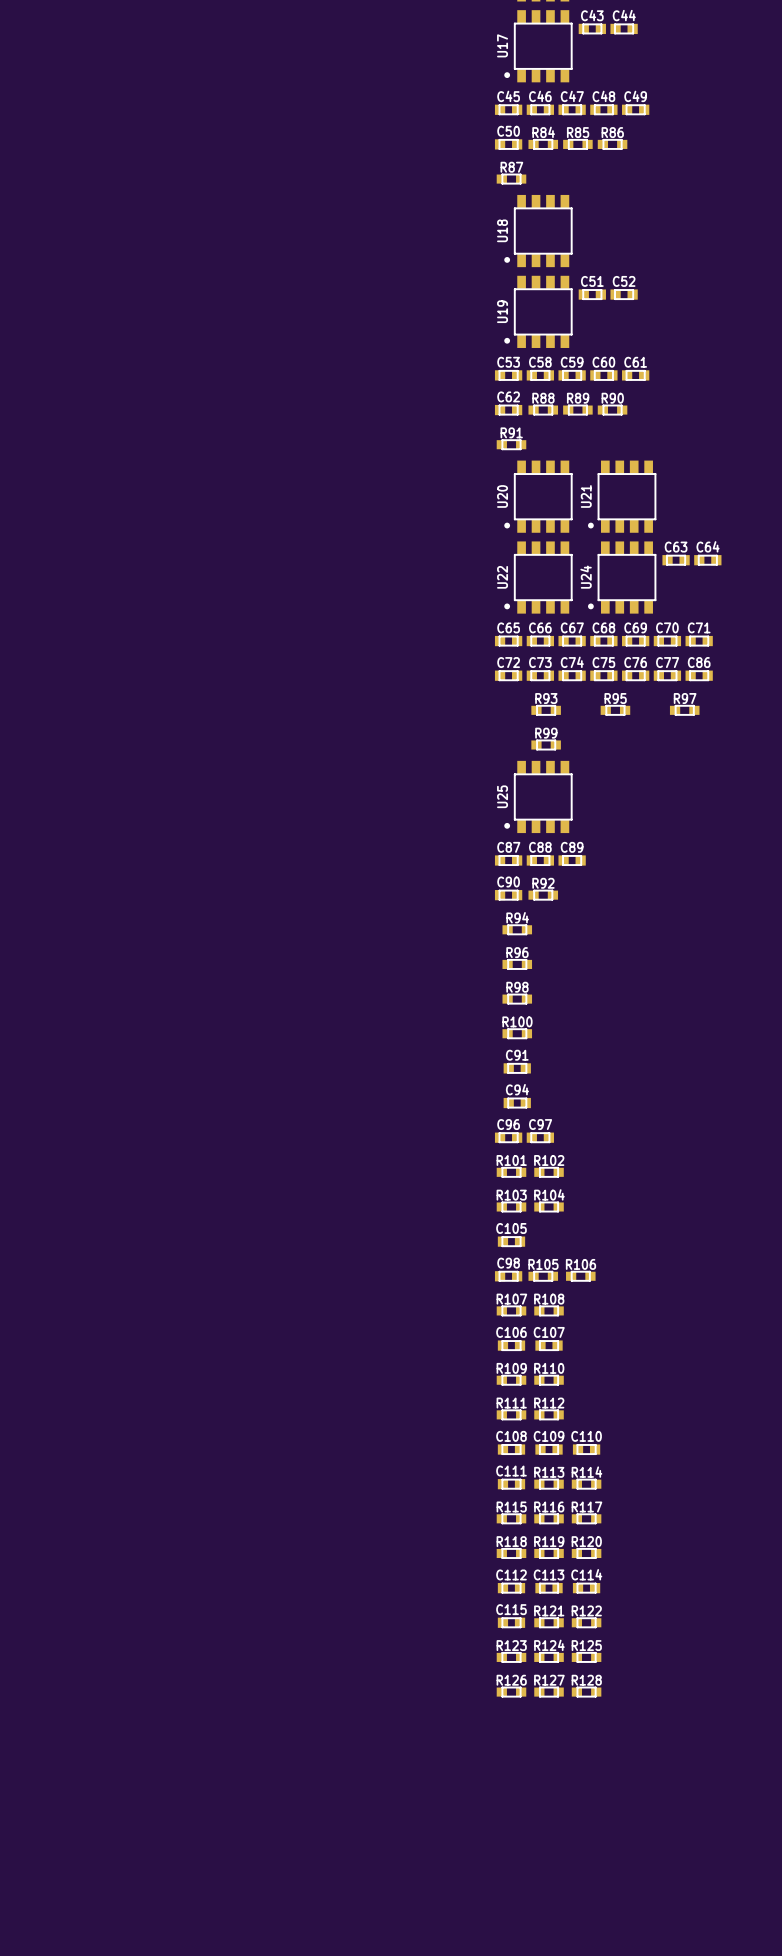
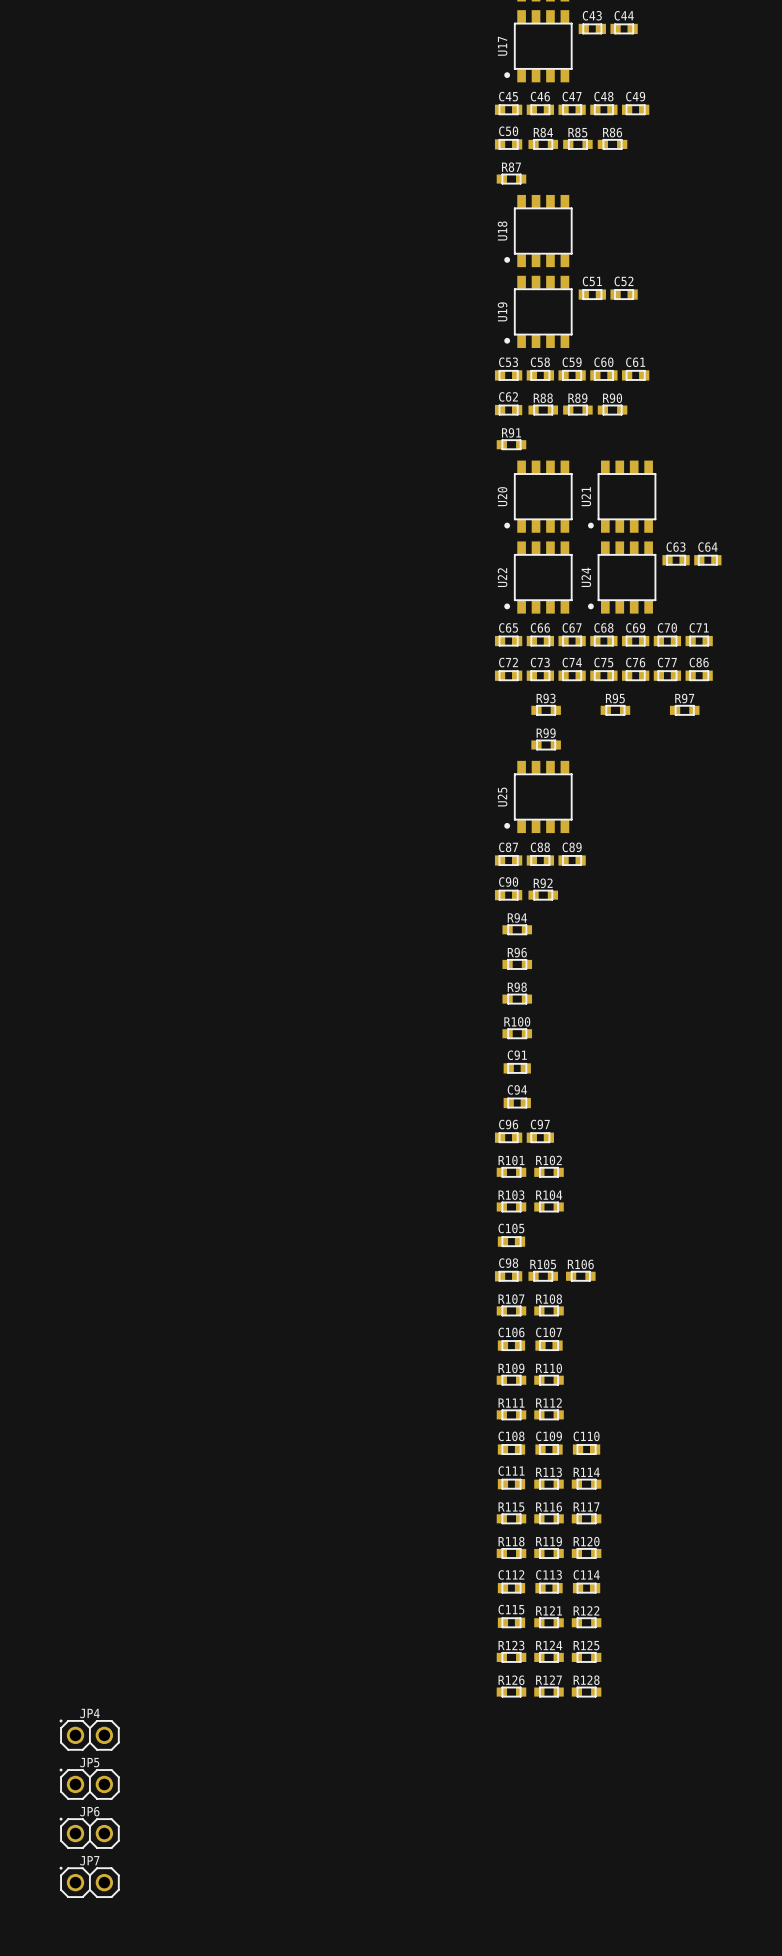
JP4: none -> (89, 1735)
JP5: none -> (89, 1784)
JP6: none -> (89, 1833)
JP7: none -> (89, 1882)

